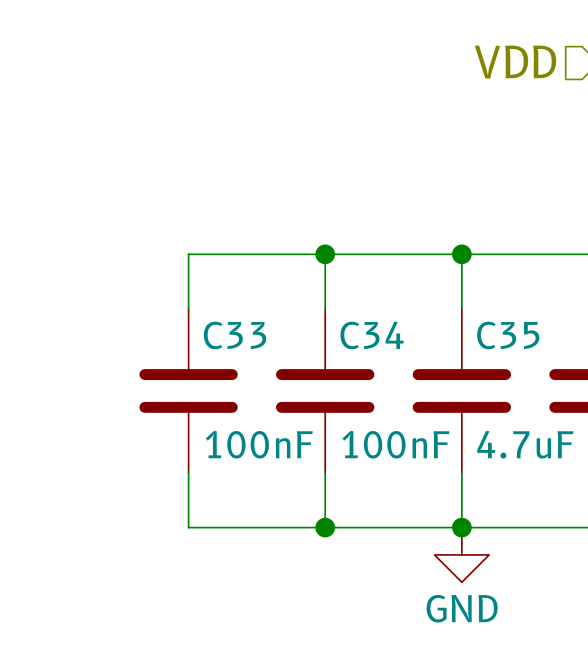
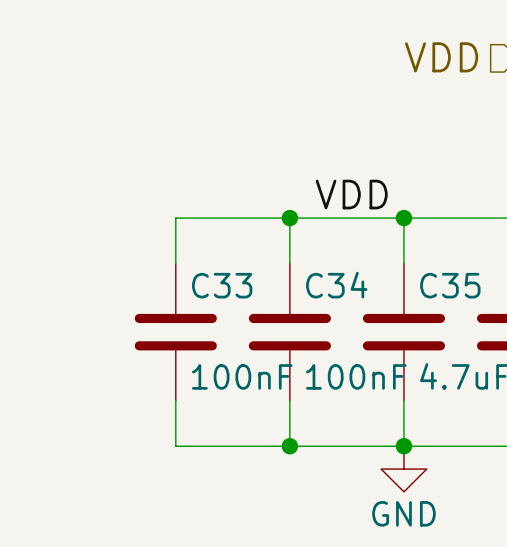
label: none -> VDD (351, 194)

